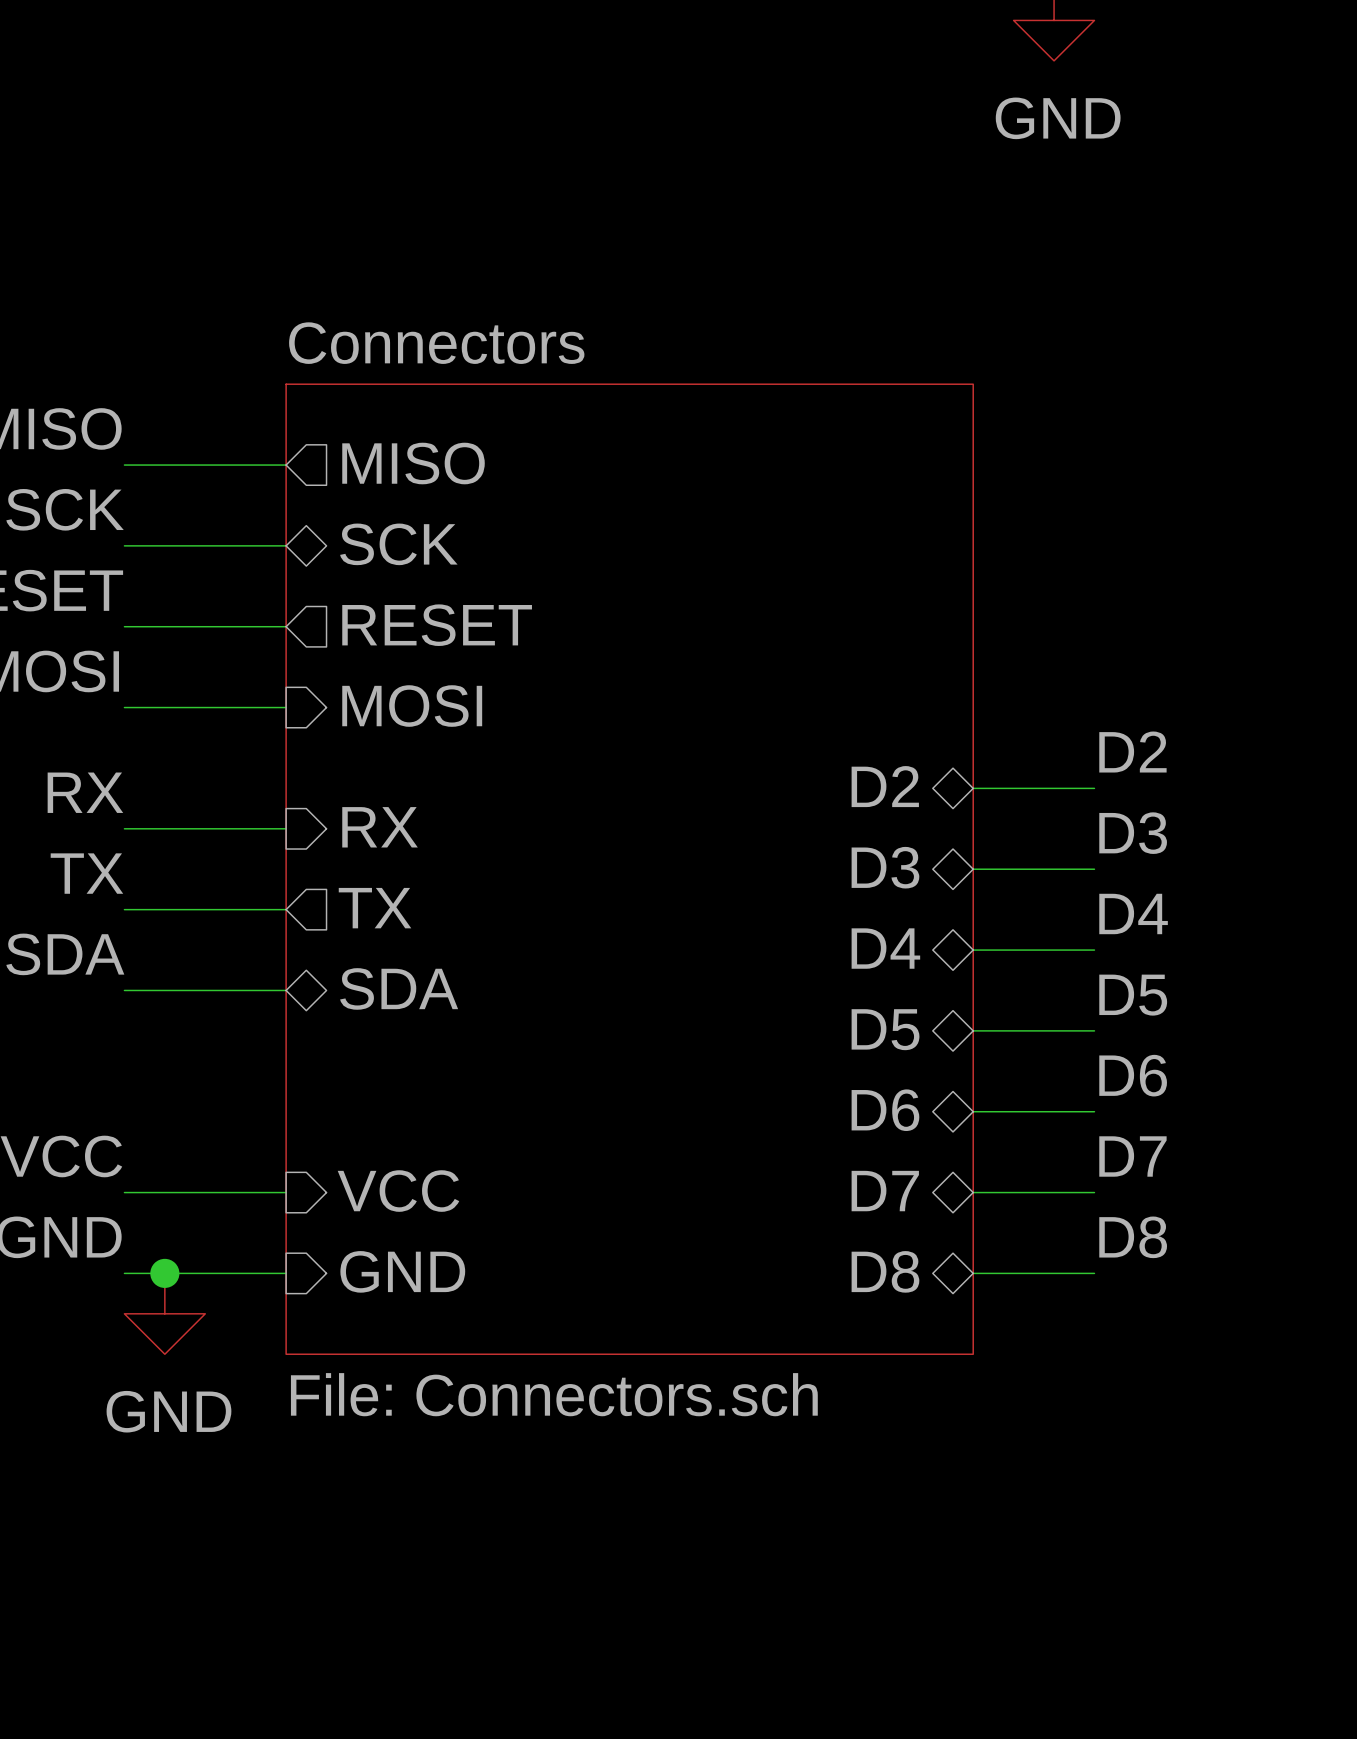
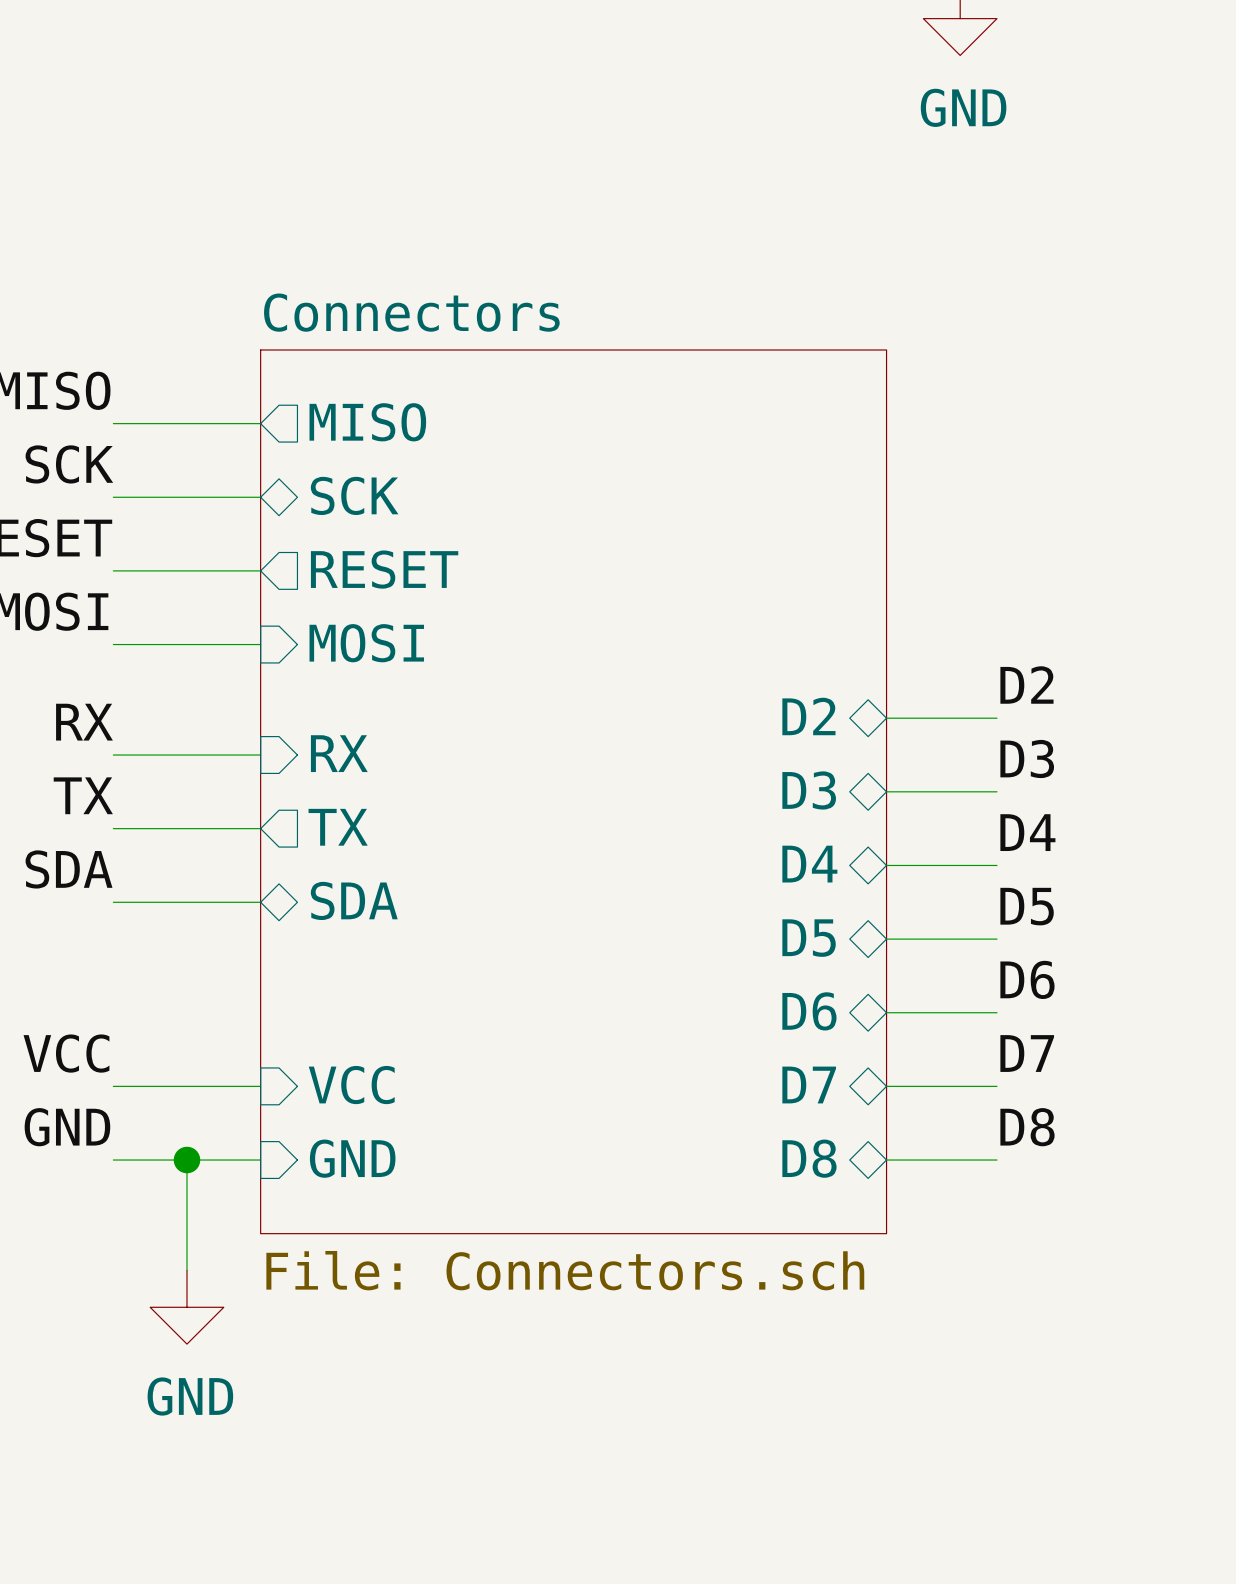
junction position: (164, 1273) -> (186, 1160)
wire: none -> (186, 1160) (186, 1270)
power symbol position: GND (164, 1313) -> GND (186, 1307)

